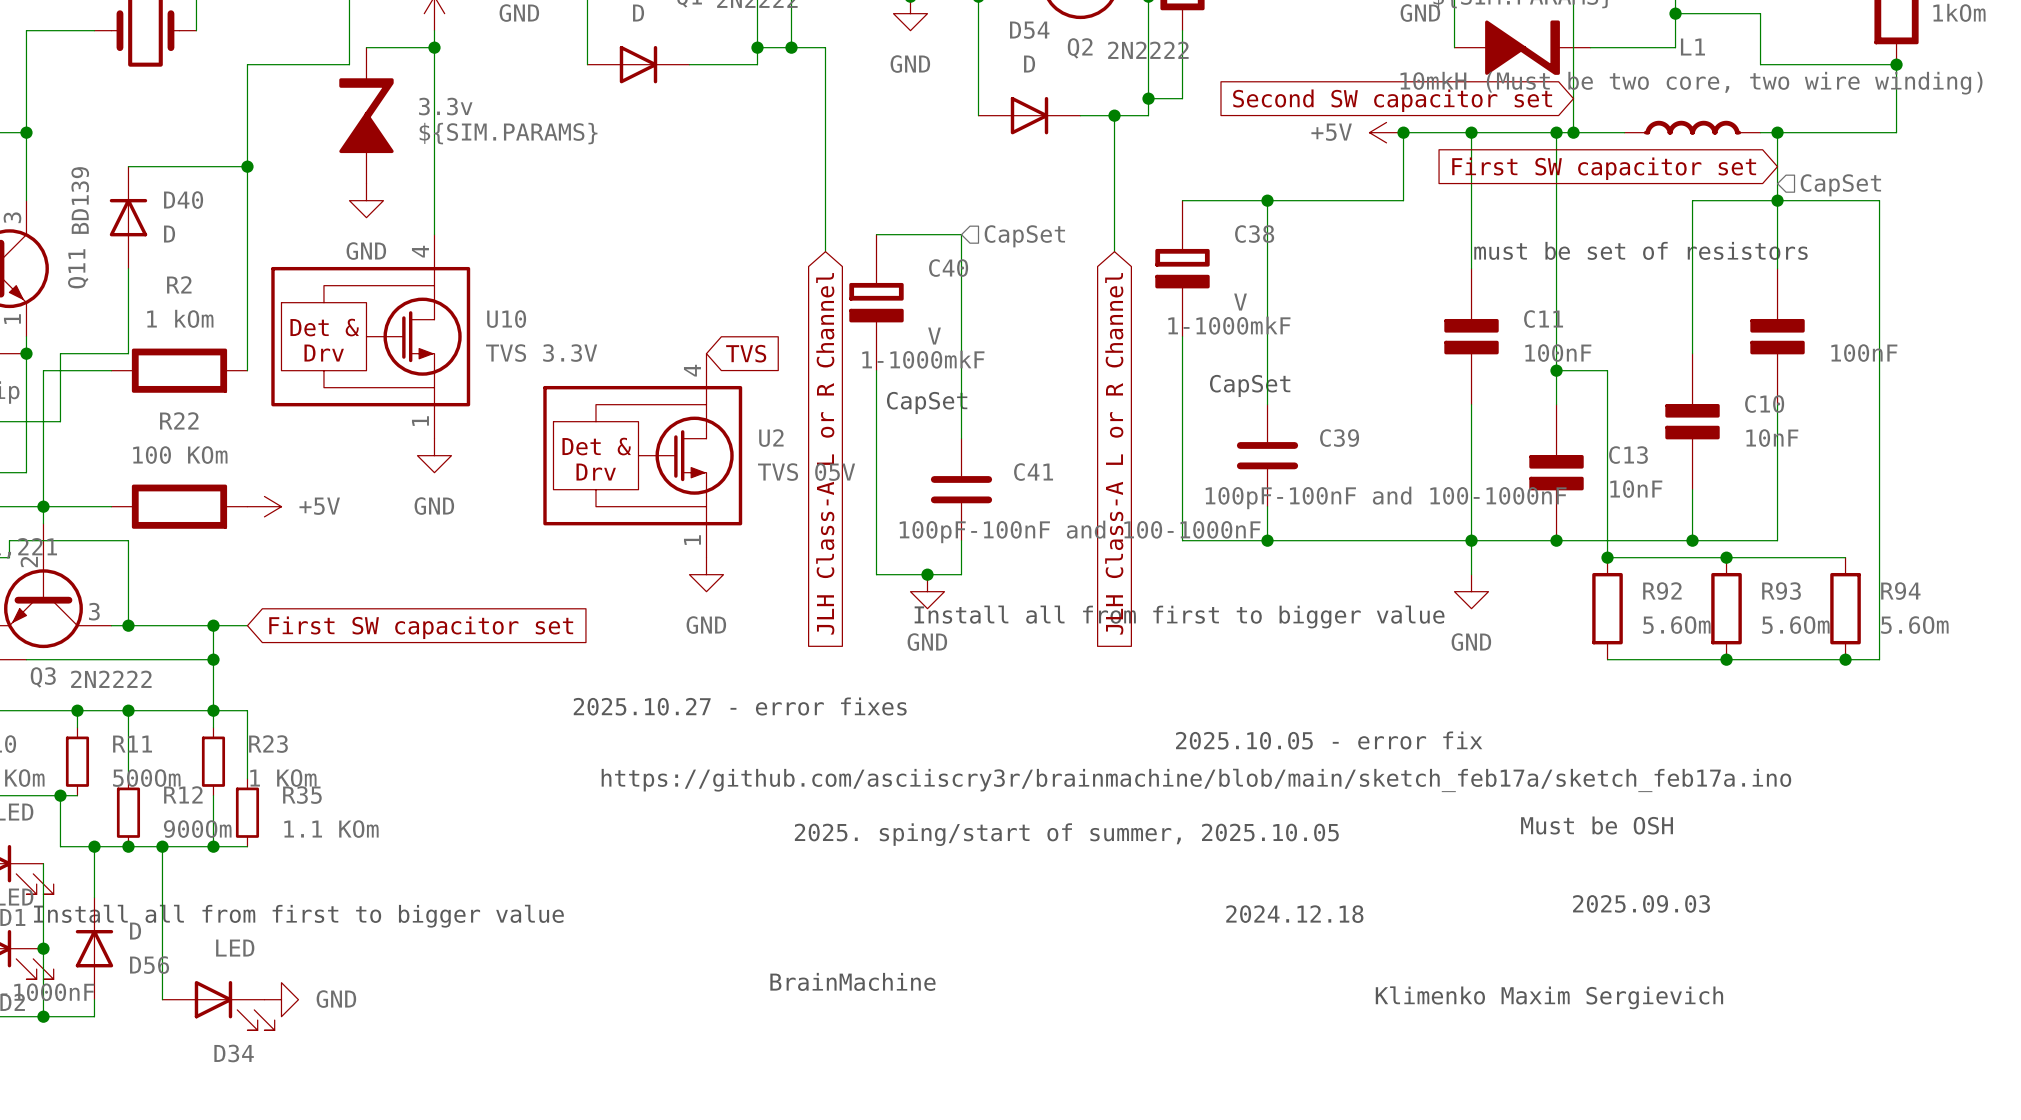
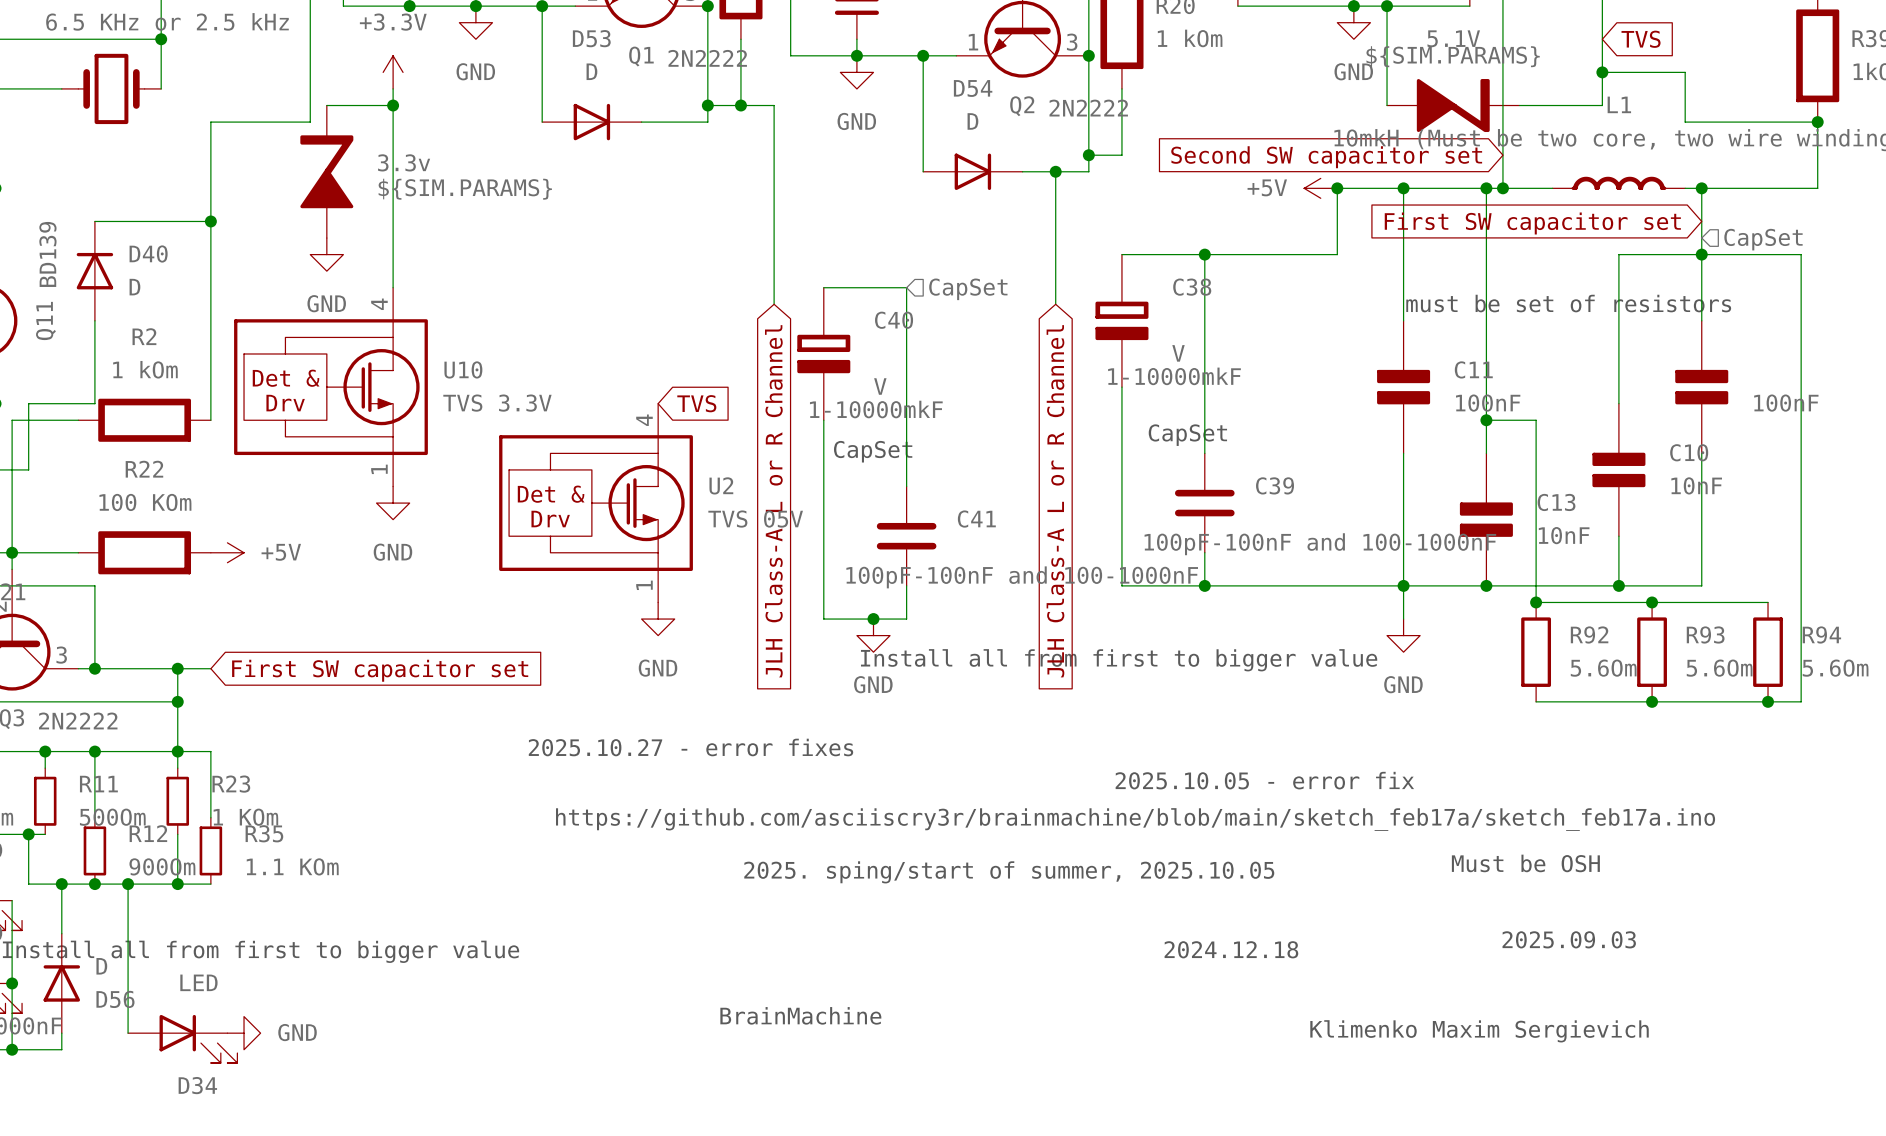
C38 value: 1-1000mkF (1229, 325) -> 1-10000mkF (1174, 376)
C40 value: 1-1000mkF (923, 359) -> 1-10000mkF (876, 409)

